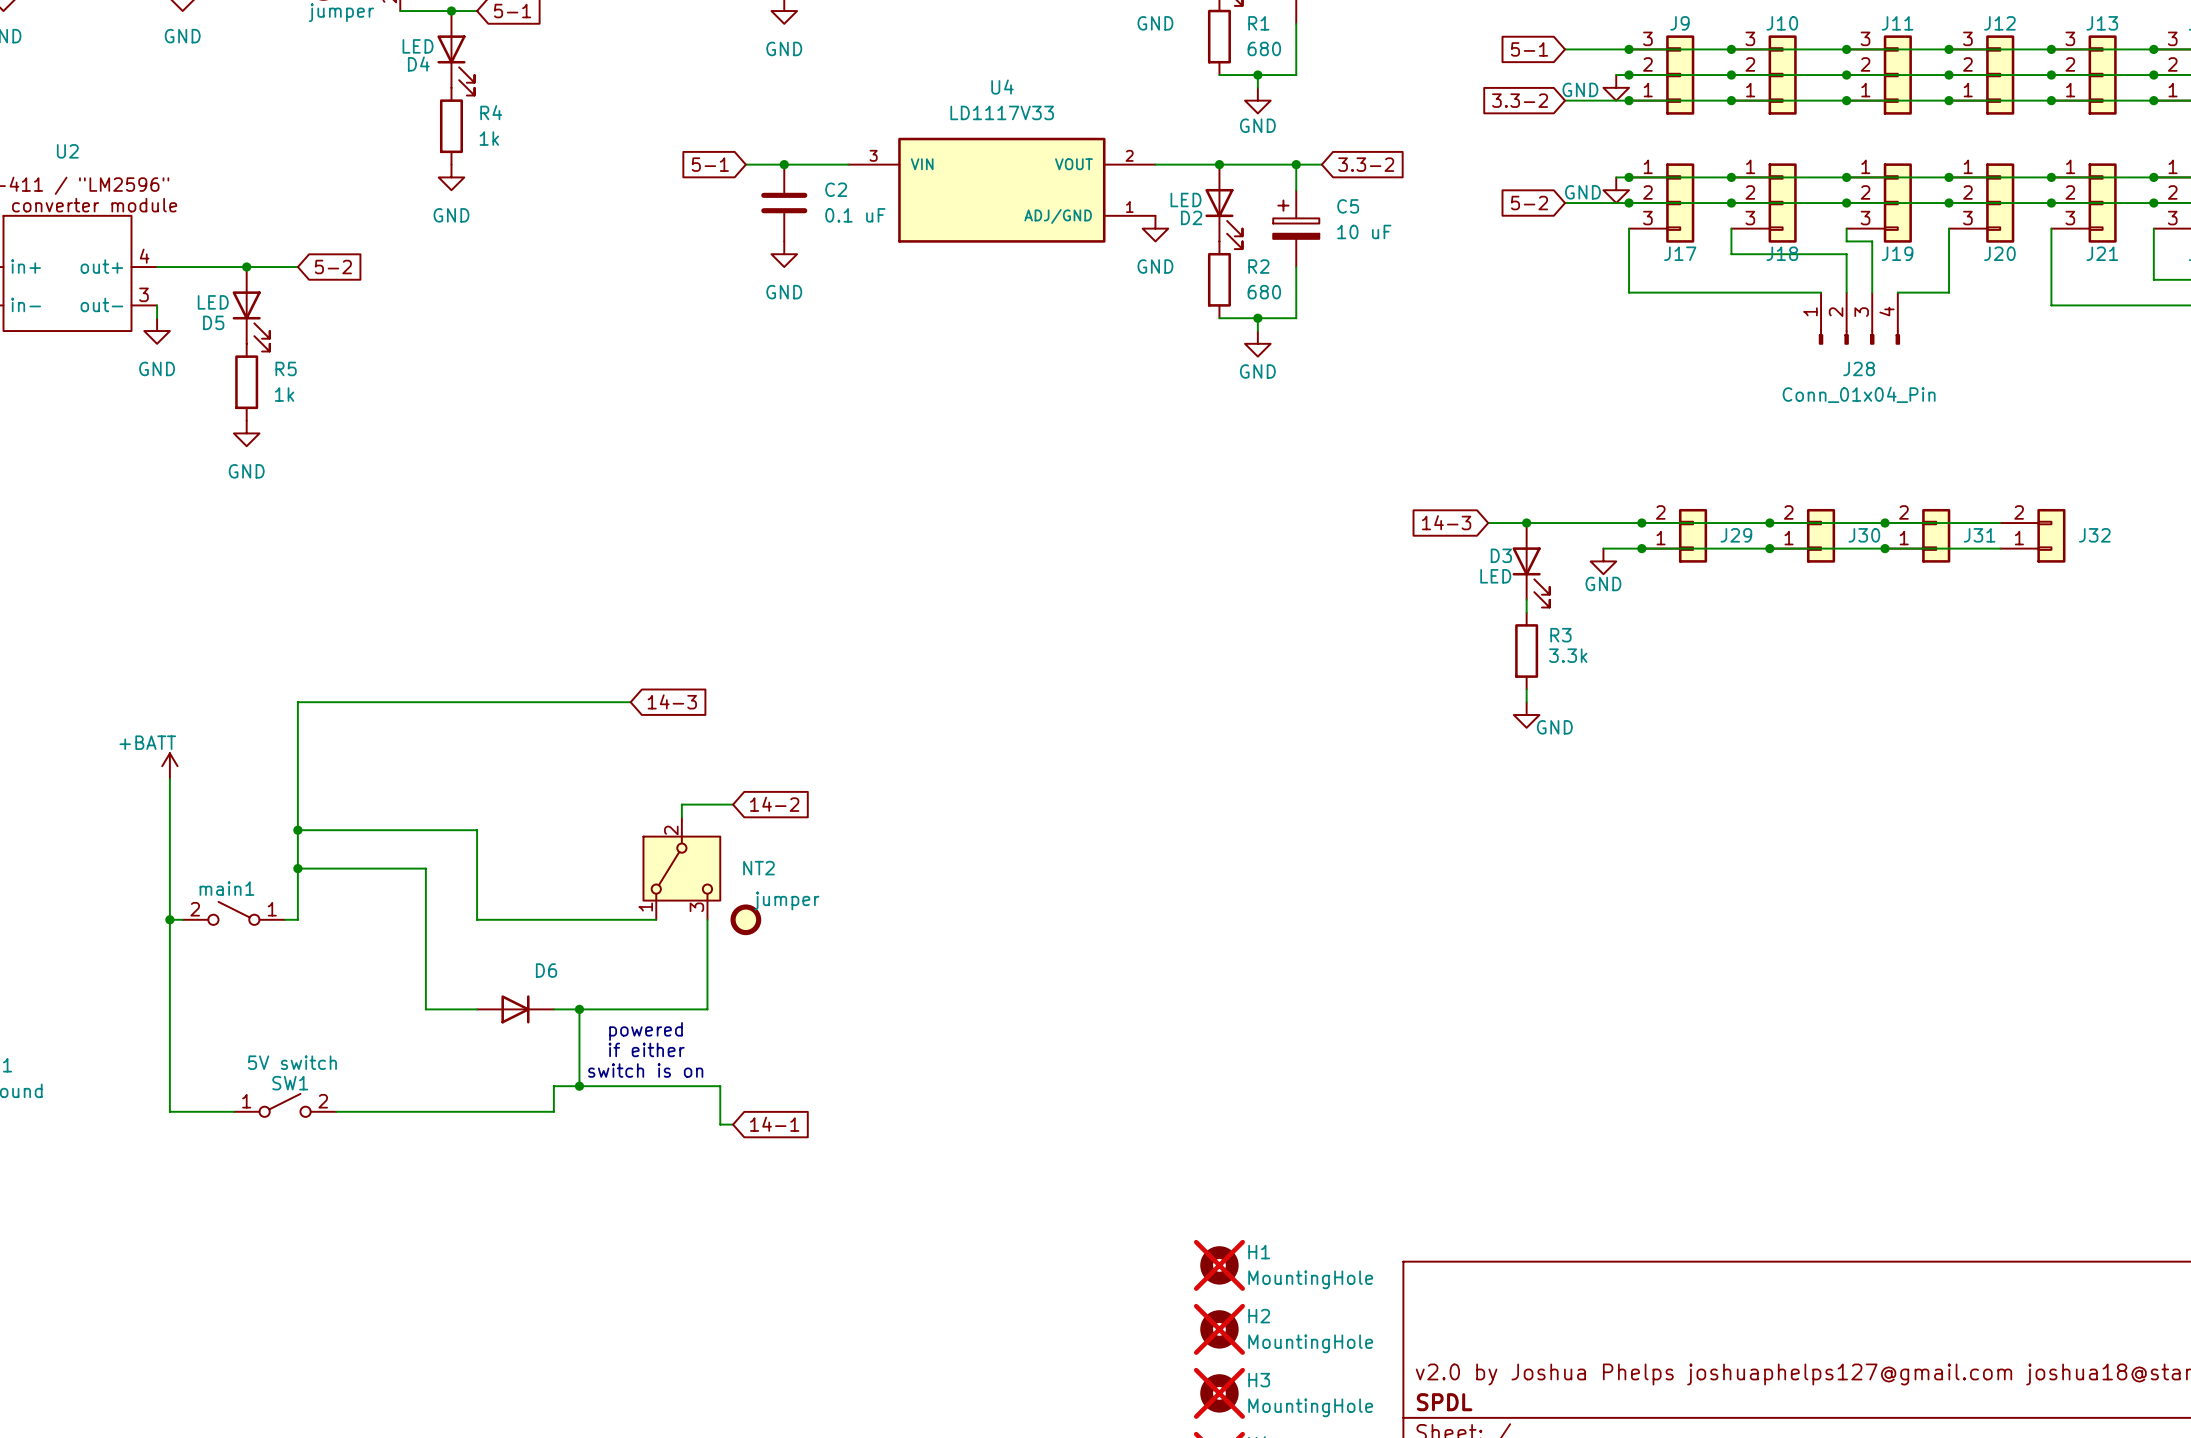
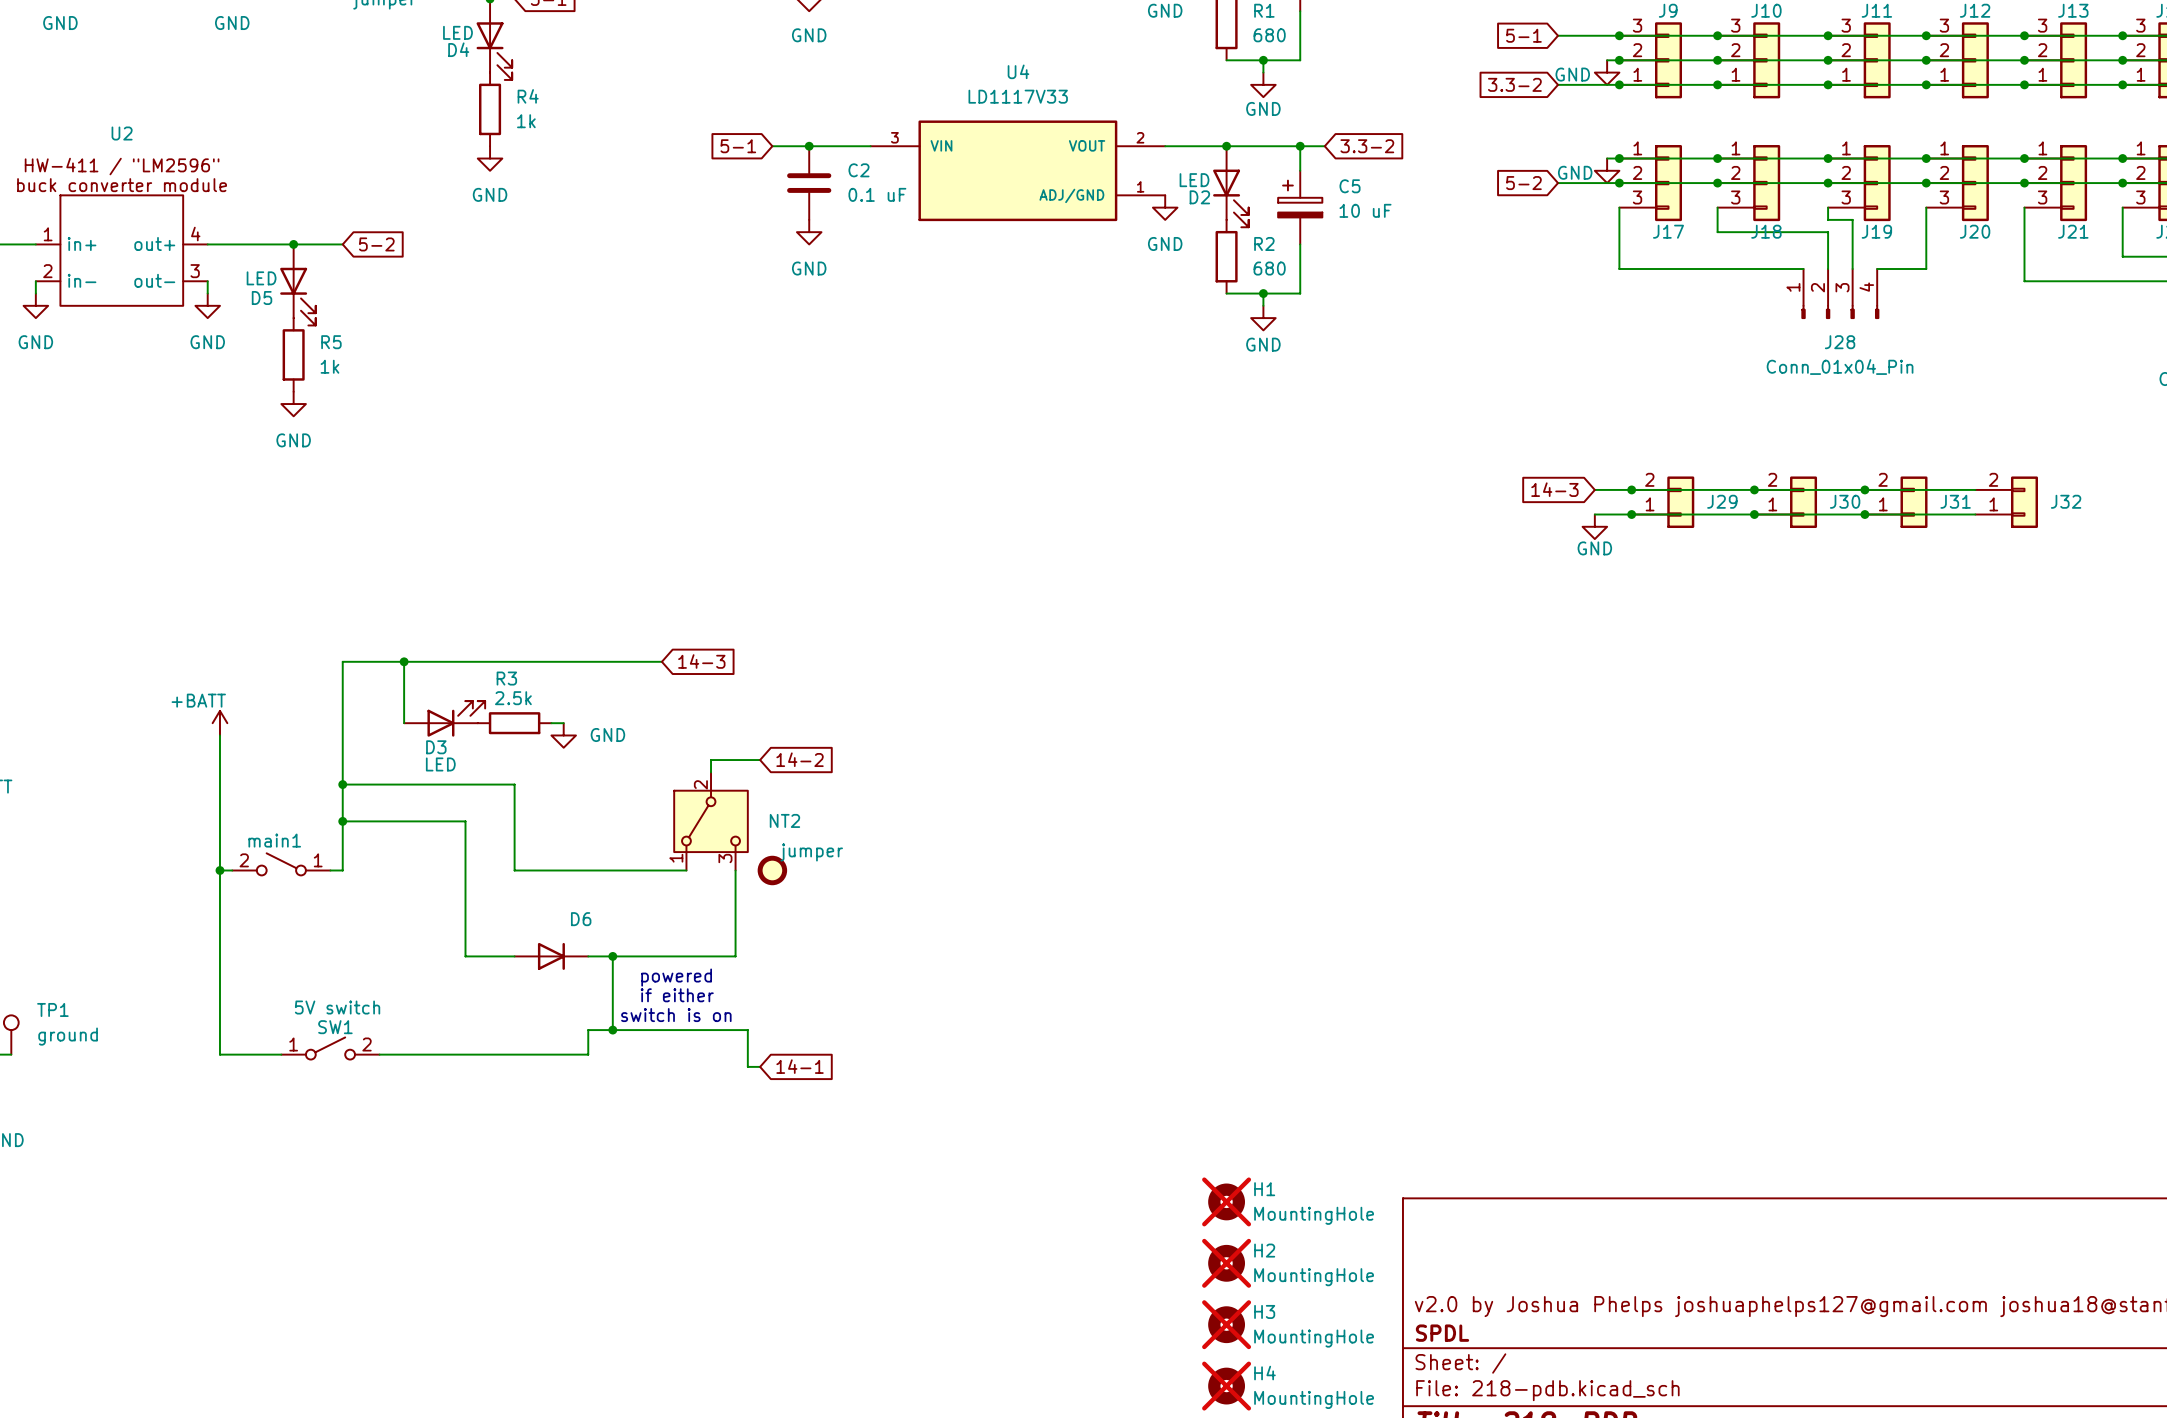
global label position: 14-3 (1446, 522) -> 14-3 (1554, 489)
wire: (1488, 523) (1603, 523) -> none
junction: (1526, 523) -> none
D3 position: (1531, 565) -> (444, 718)
D3 value position: LED (1495, 576) -> LED (440, 764)
D3 rotation: 0° (1531, 577) -> 90° counterclockwise (456, 718)
wire: (1526, 599) (1526, 612) -> none
R3 name position: R3 (1560, 635) -> R3 (506, 678)
R3 rotation: 0° (1526, 651) -> 90° clockwise (514, 723)
R3 position: (1526, 651) -> (514, 723)
R3 value: 3.3k (1568, 655) -> 2.5k (513, 698)
wire: (1526, 689) (1526, 702) -> none
wire: none -> (404, 661) (404, 723)
junction: none -> (404, 661)
power symbol: GND (1526, 715) -> none
wire: none -> (551, 723) (563, 723)
power symbol: none -> GND (563, 735)

